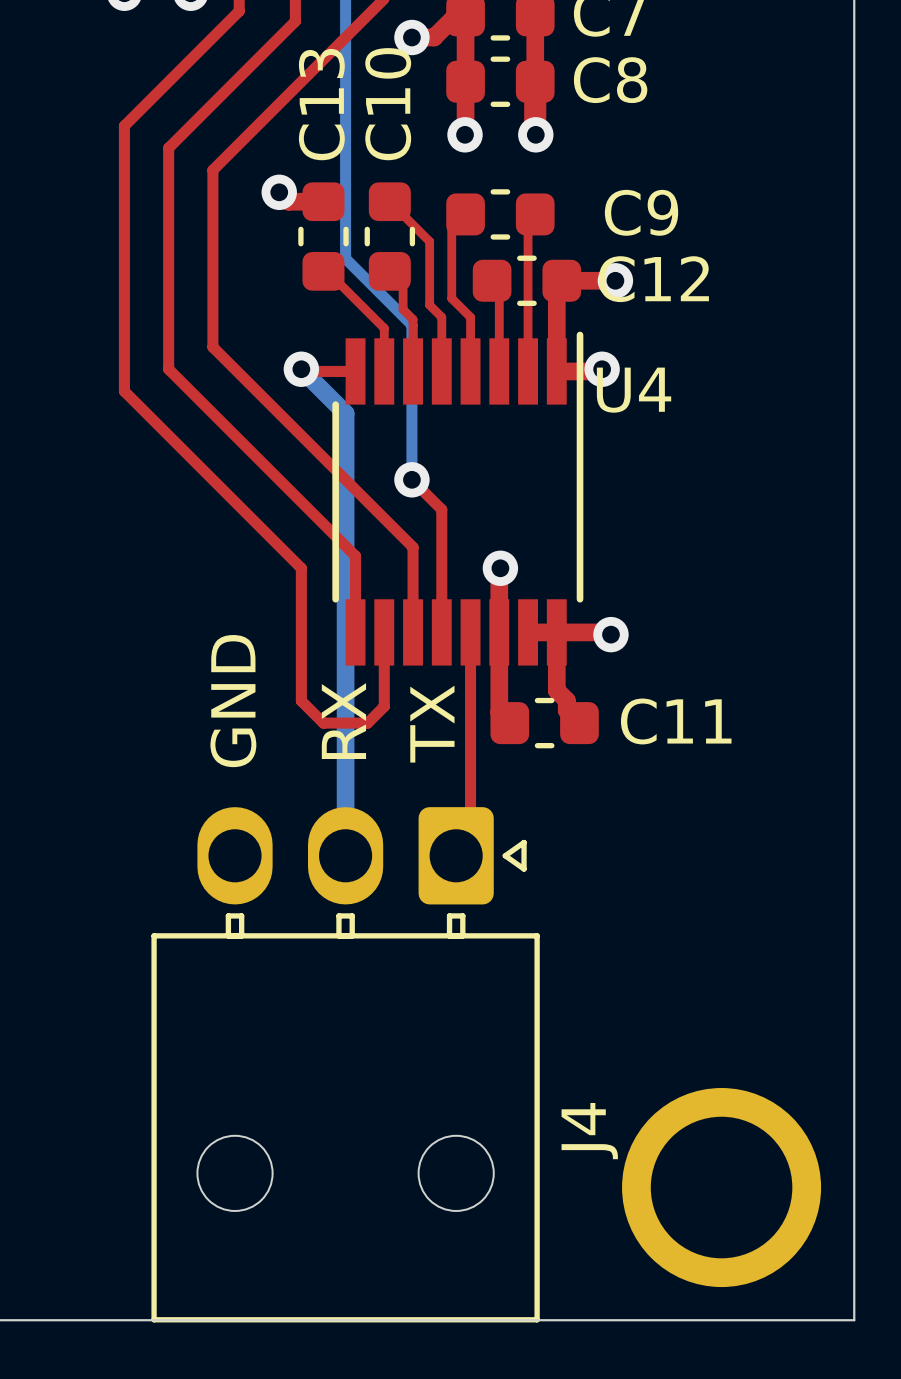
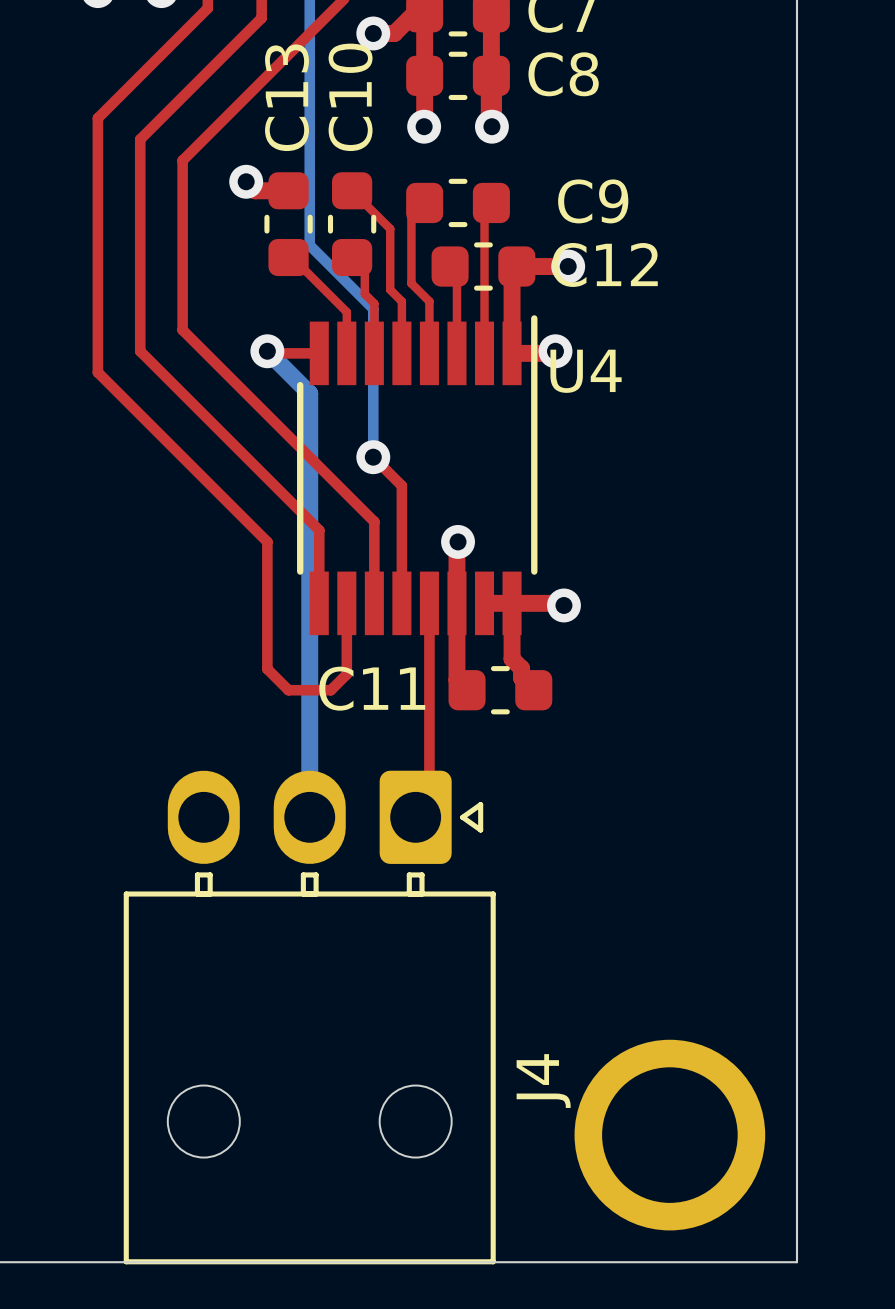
text: GND (233, 701) -> none
text: RX (343, 721) -> none
C11 name position: C11 (676, 721) -> C11 (372, 688)
text: TX (432, 724) -> none

